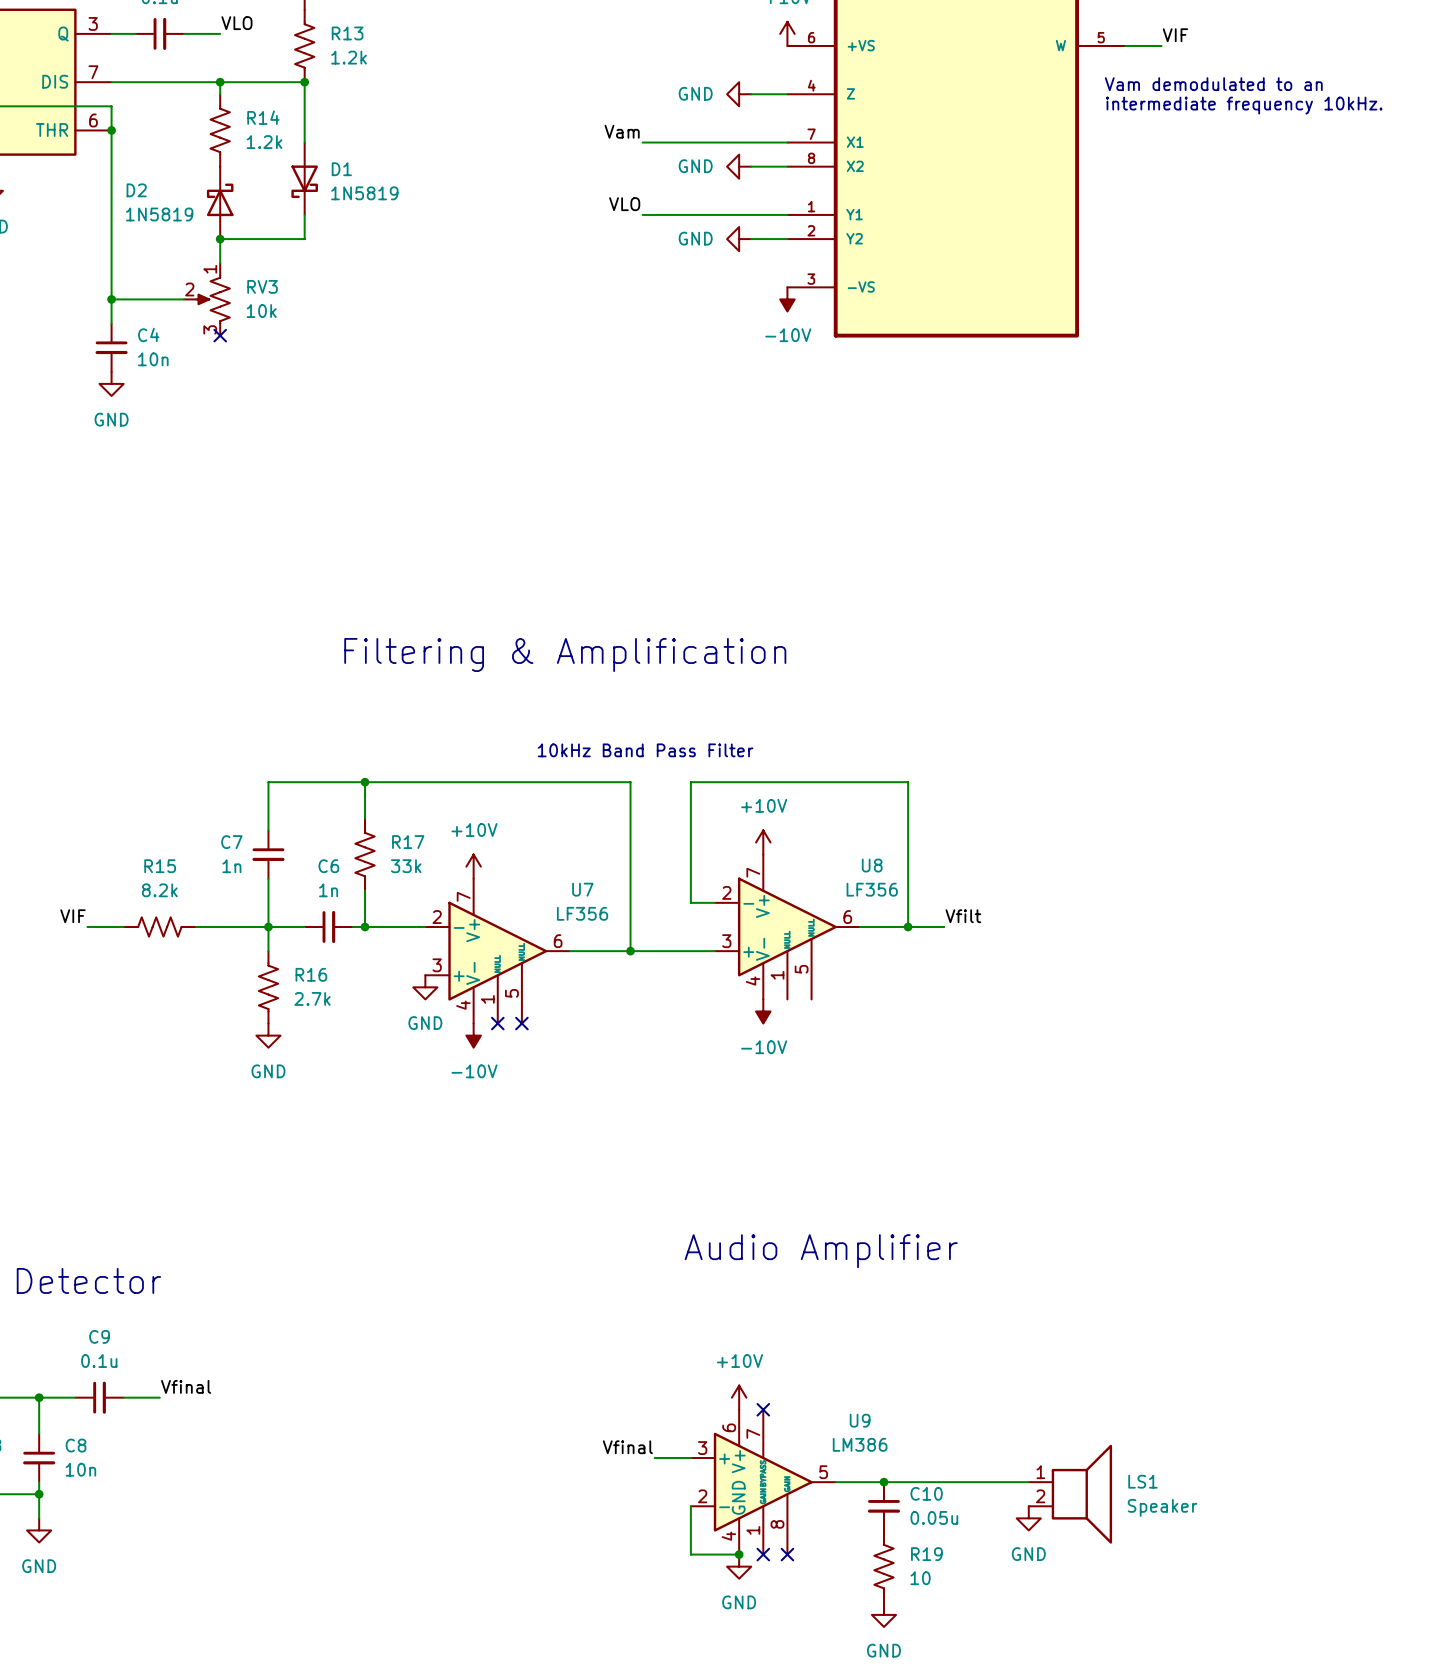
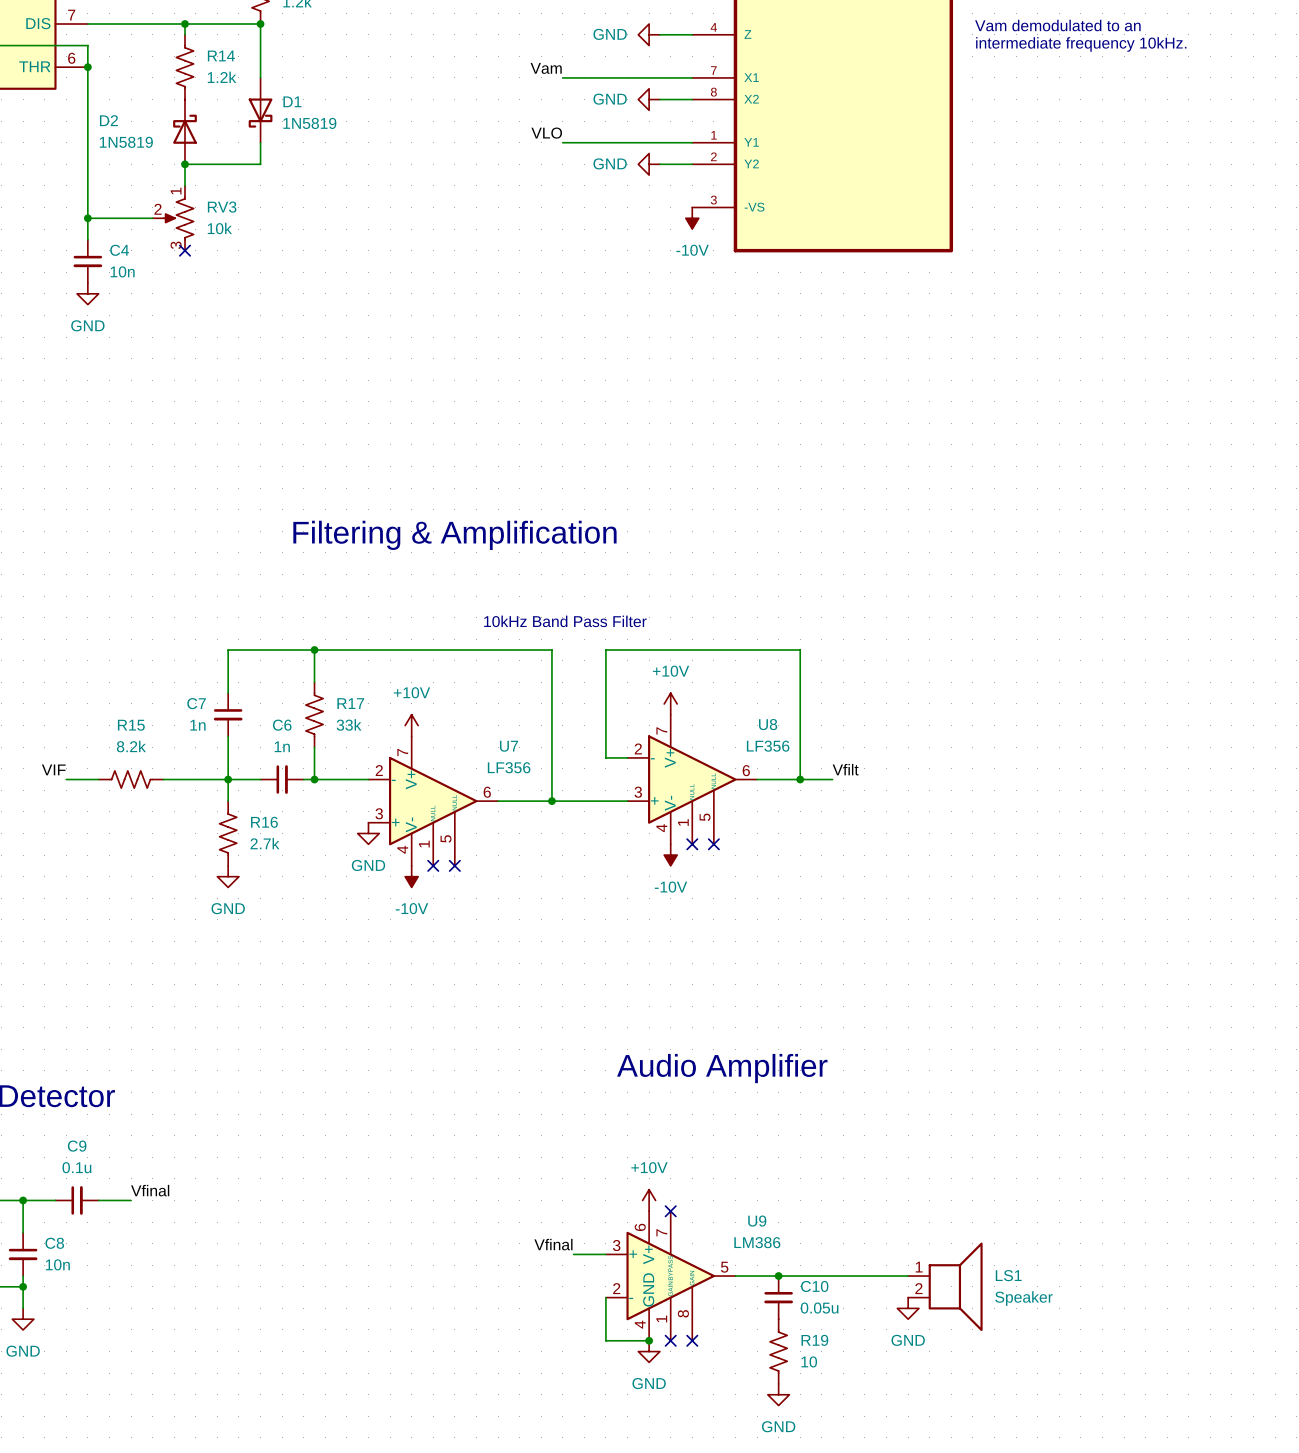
no-connect mark: none -> (692, 844)
no-connect mark: none -> (713, 844)

